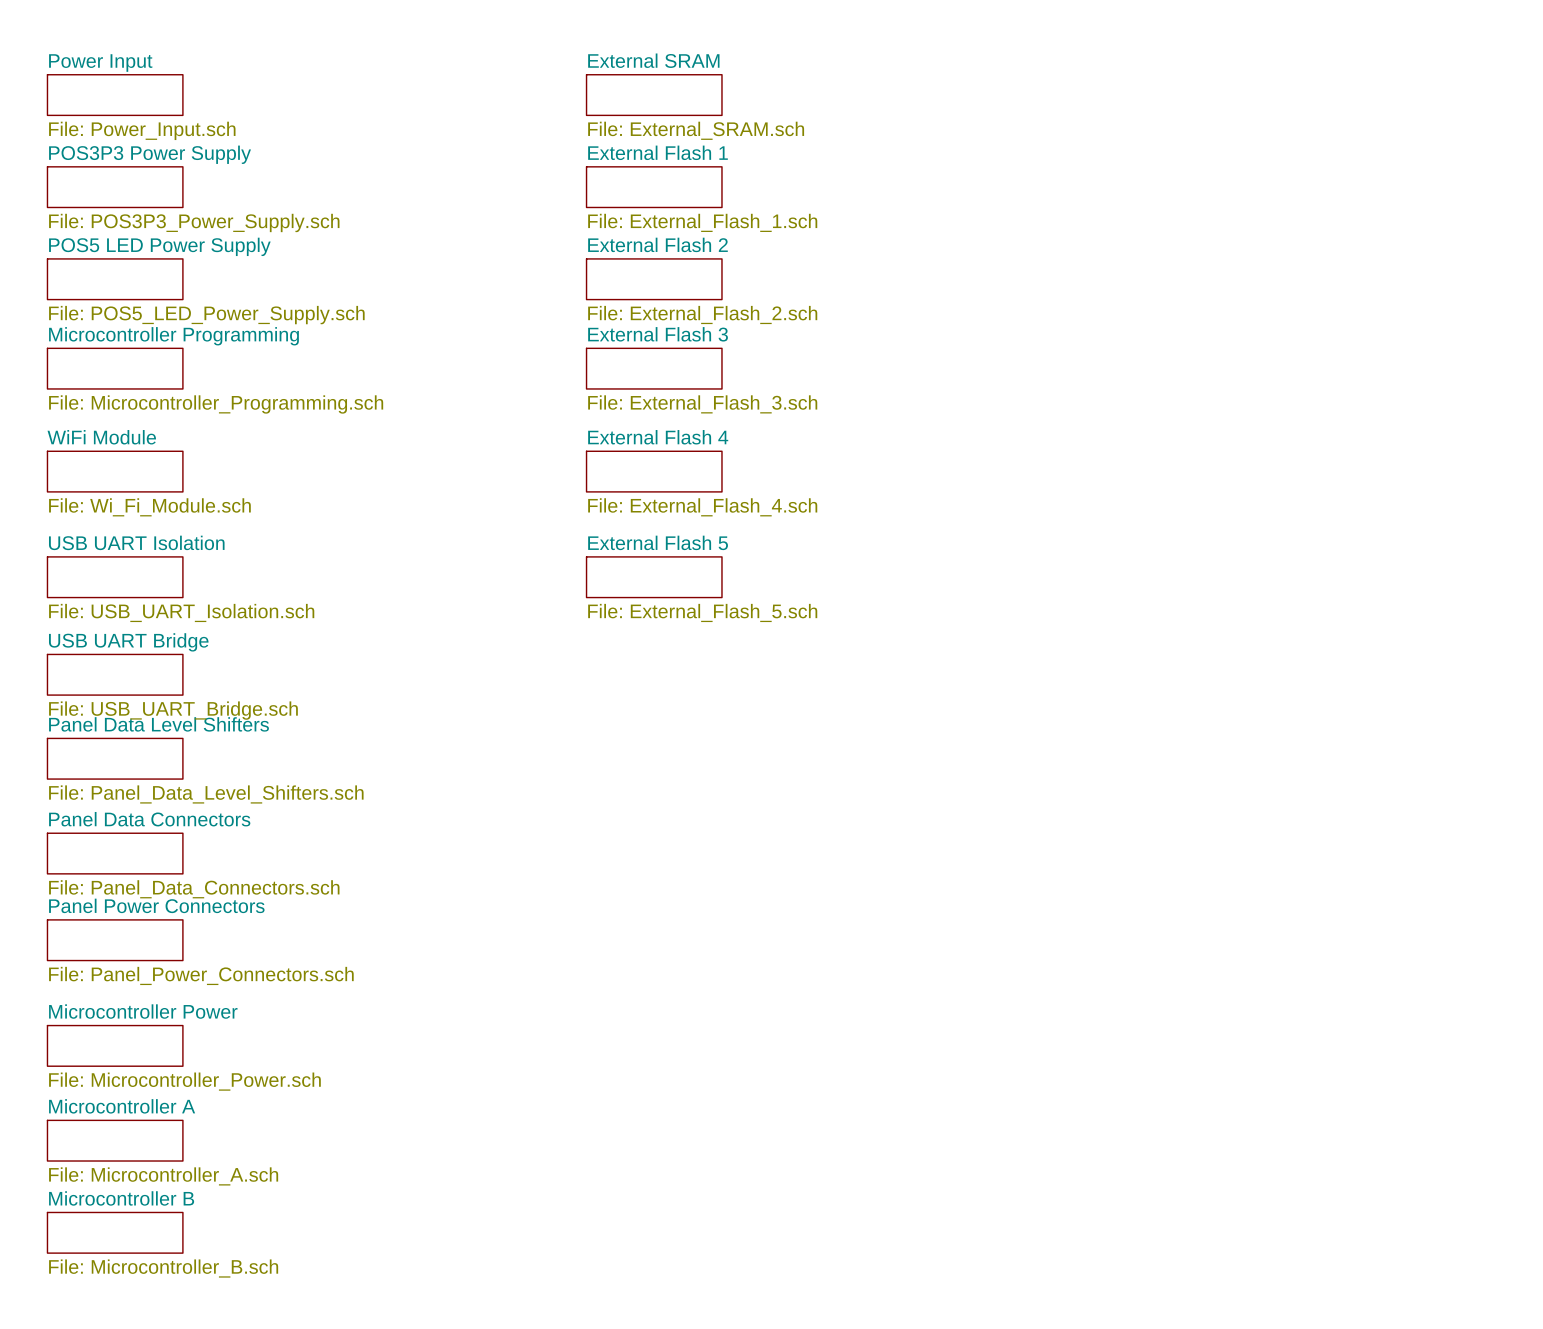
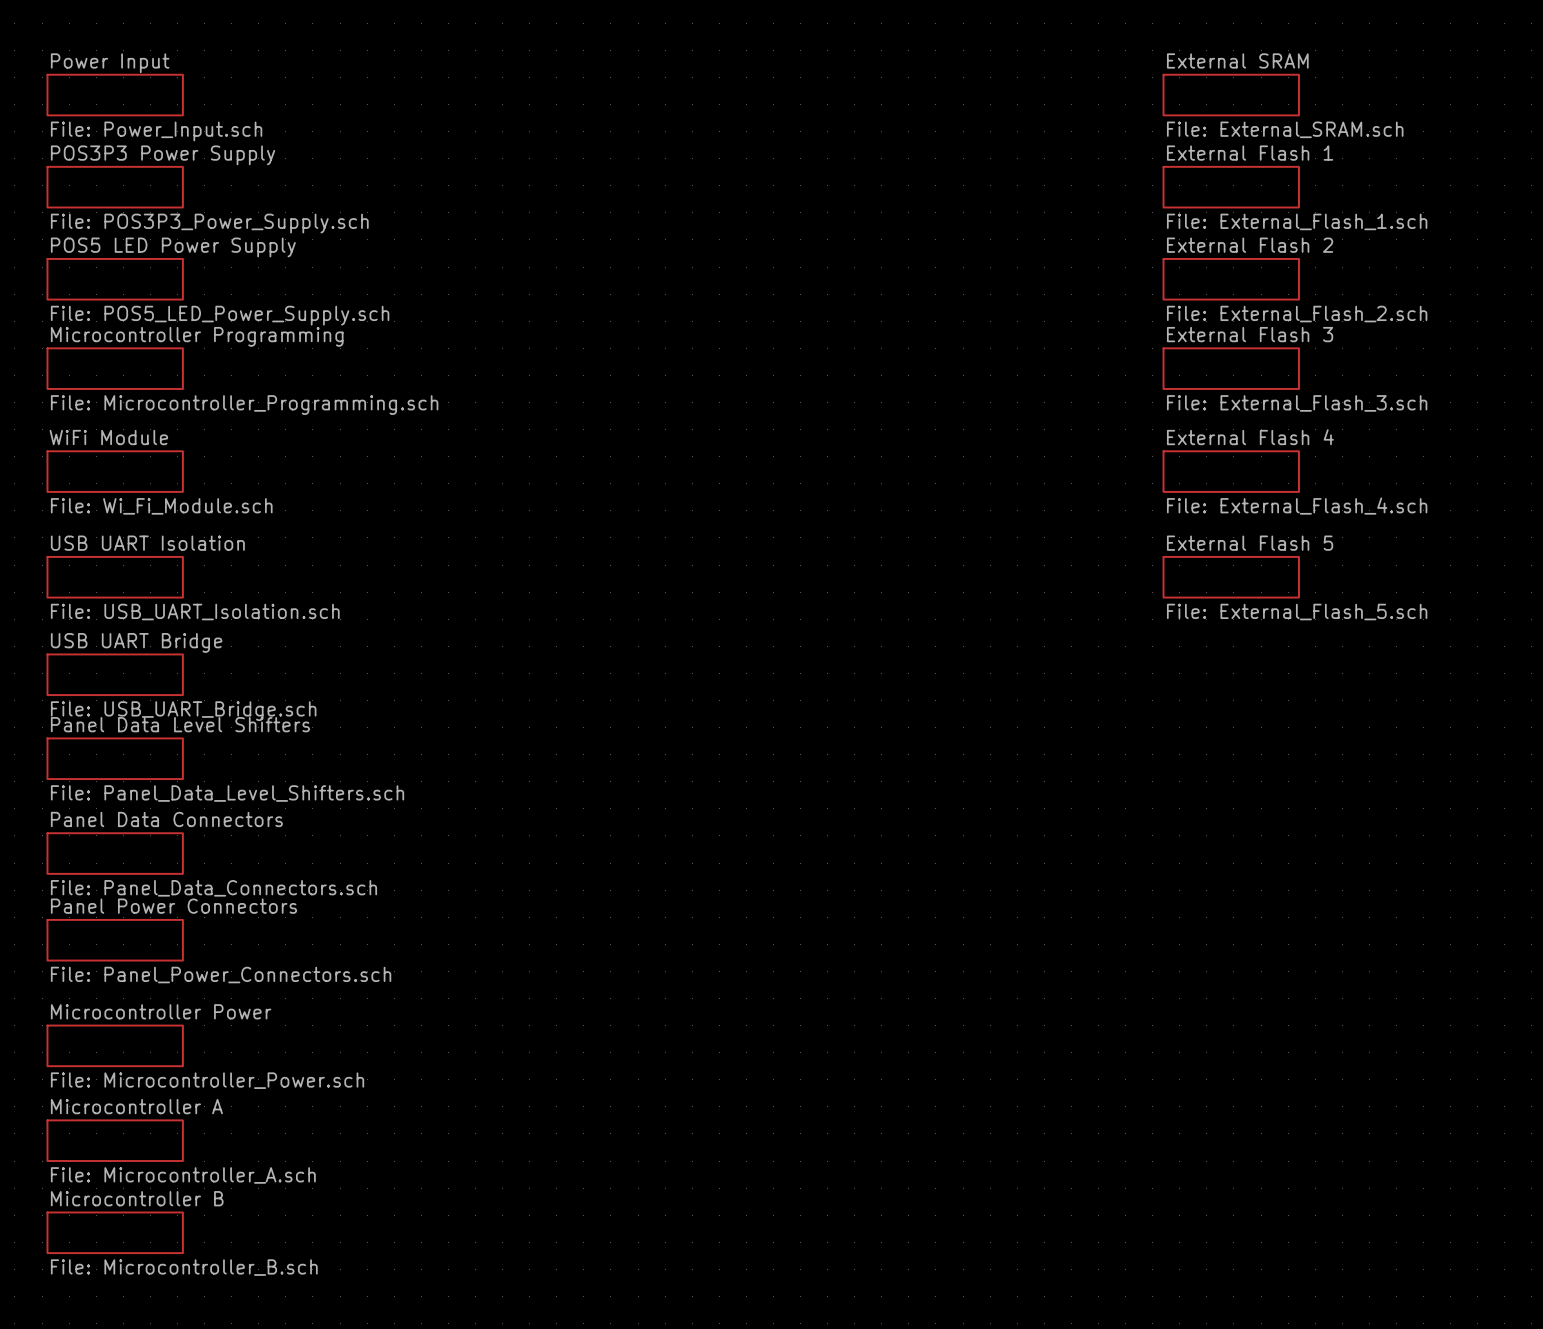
sheet External SRAM: File: External_SRAM.sch (654, 95) -> none
sheet External SRAM: none -> File: External_SRAM.sch (1231, 95)
sheet External Flash 1 position: (654, 187) -> (1231, 187)
sheet External Flash 2 position: (654, 279) -> (1231, 279)
sheet External Flash 3 position: (654, 368) -> (1231, 368)
sheet External Flash 4 position: (654, 471) -> (1231, 471)
sheet External Flash 5 position: (654, 577) -> (1231, 577)

